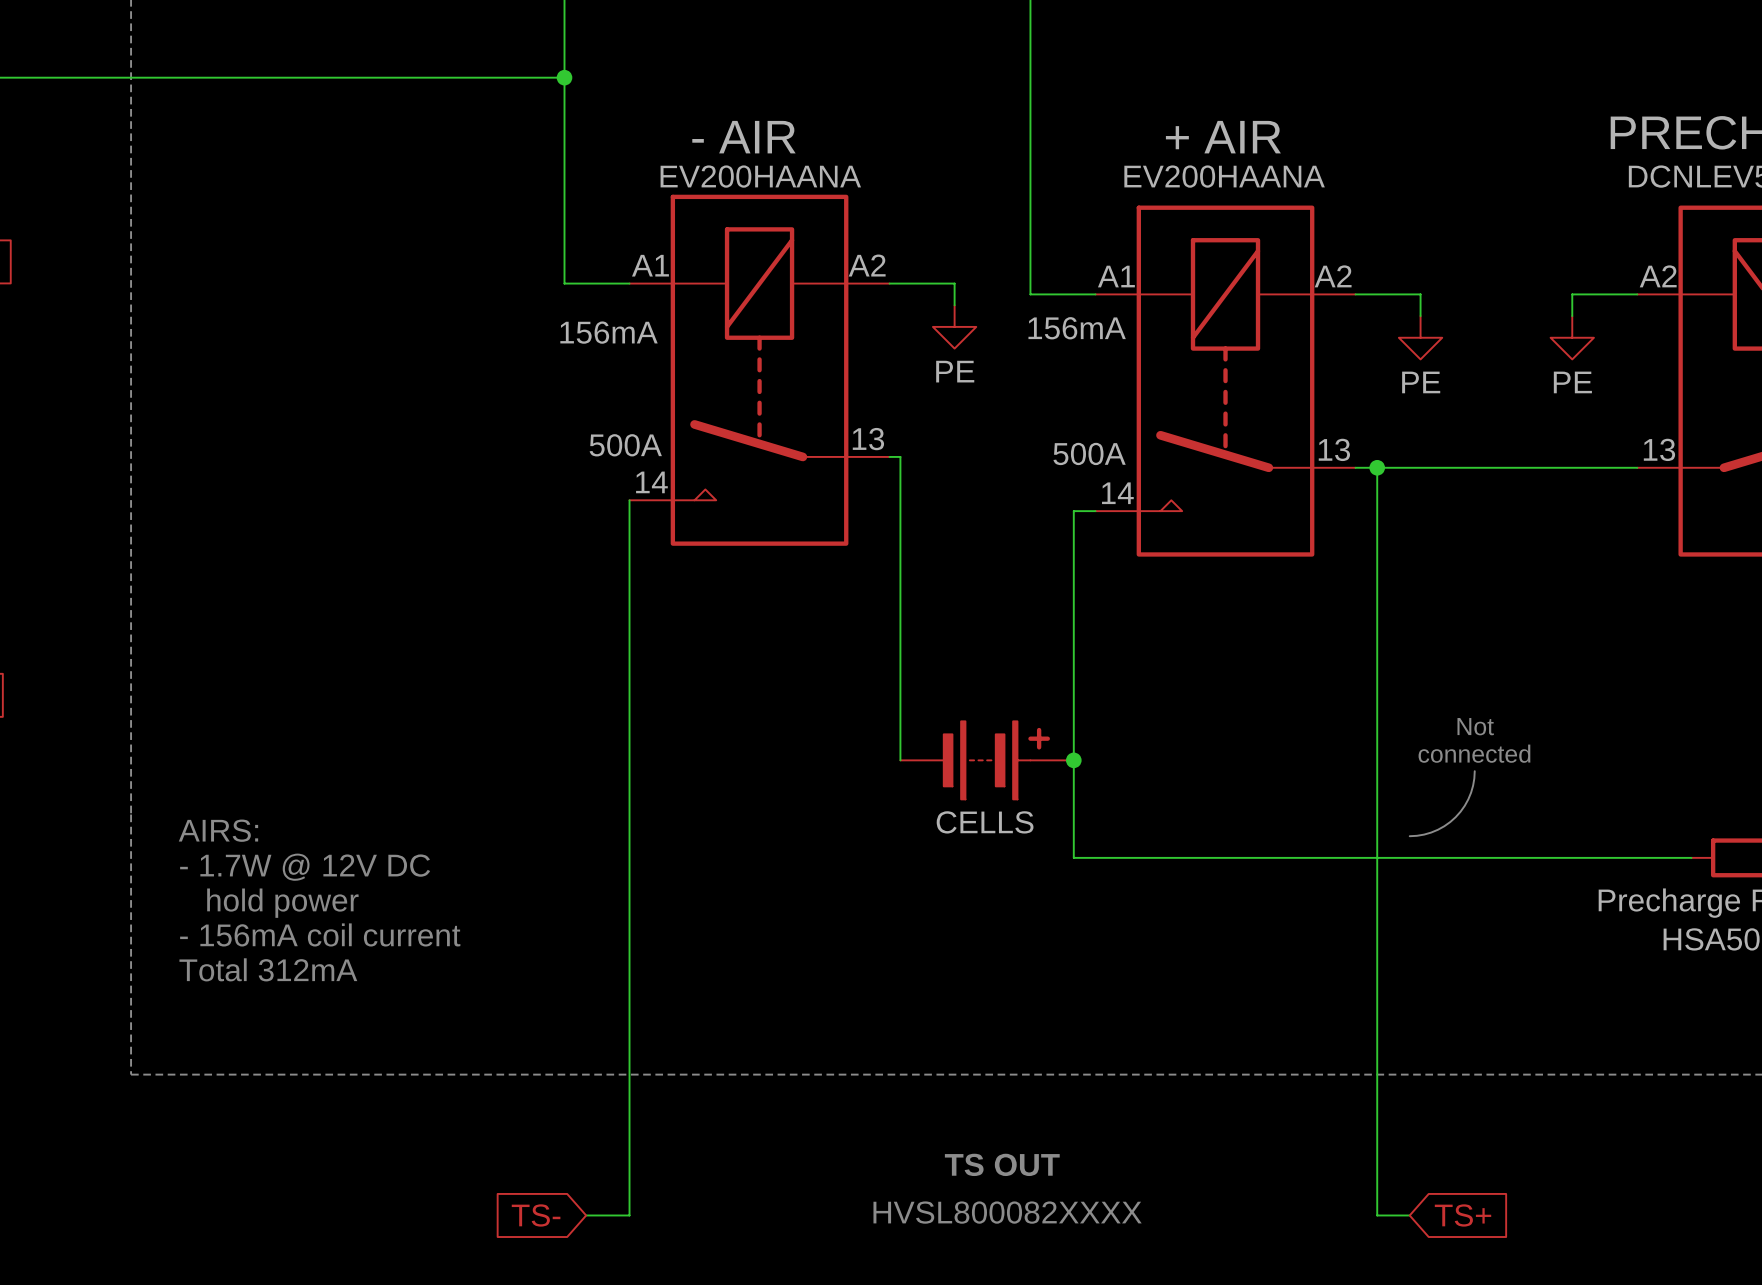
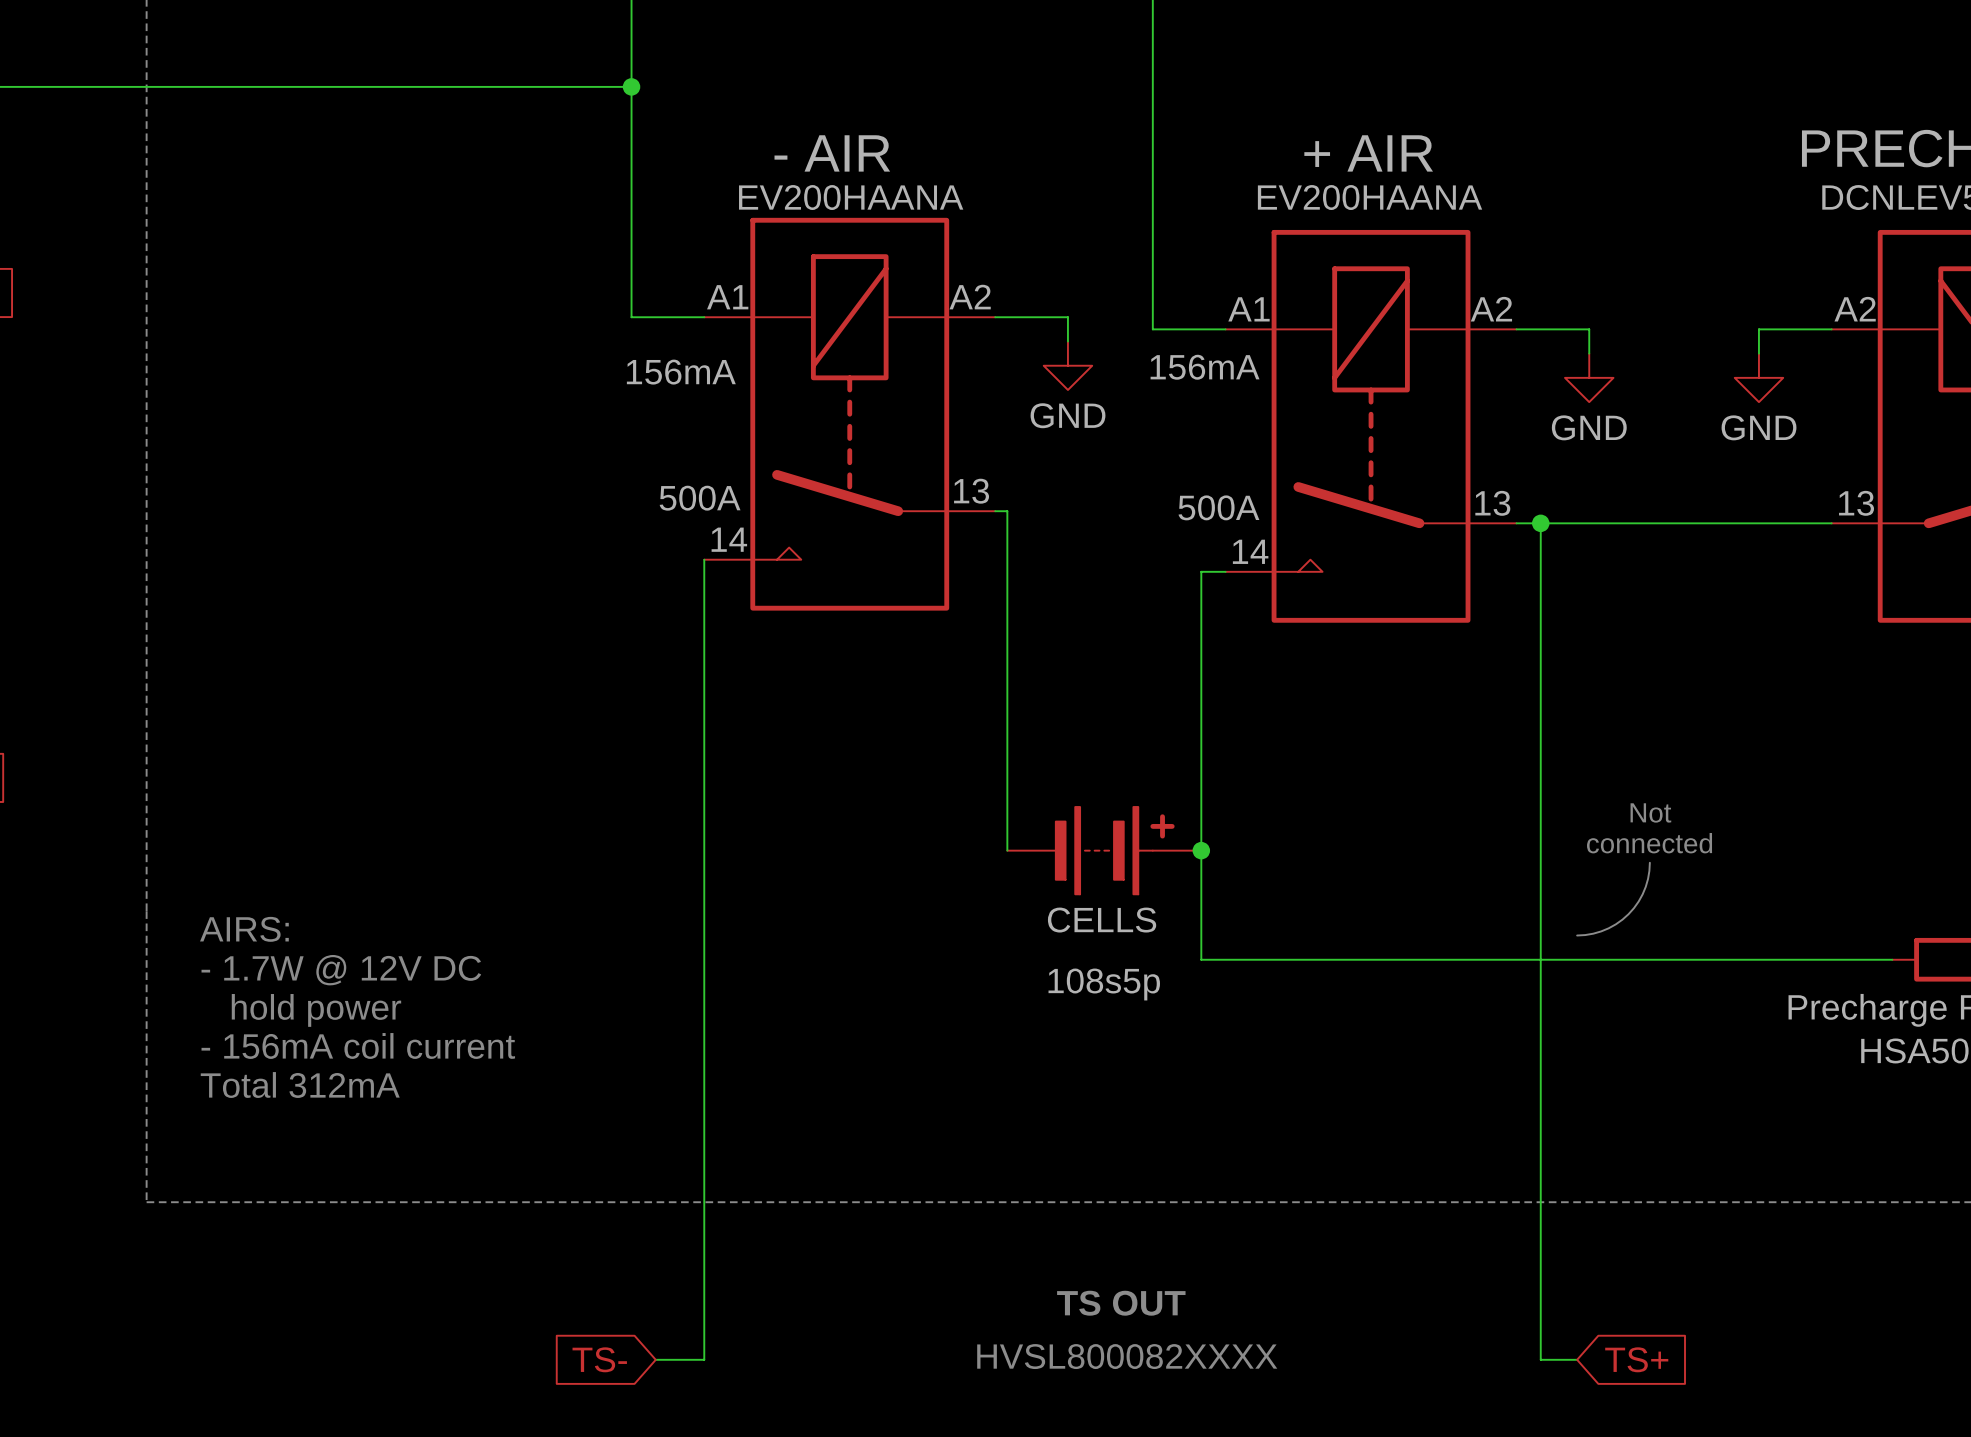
power symbol: PE (954, 326) -> GND (1067, 365)
power symbol: PE (1420, 337) -> GND (1589, 377)
power symbol: PE (1572, 337) -> GND (1758, 377)
part text: none -> 108s5p (1104, 984)

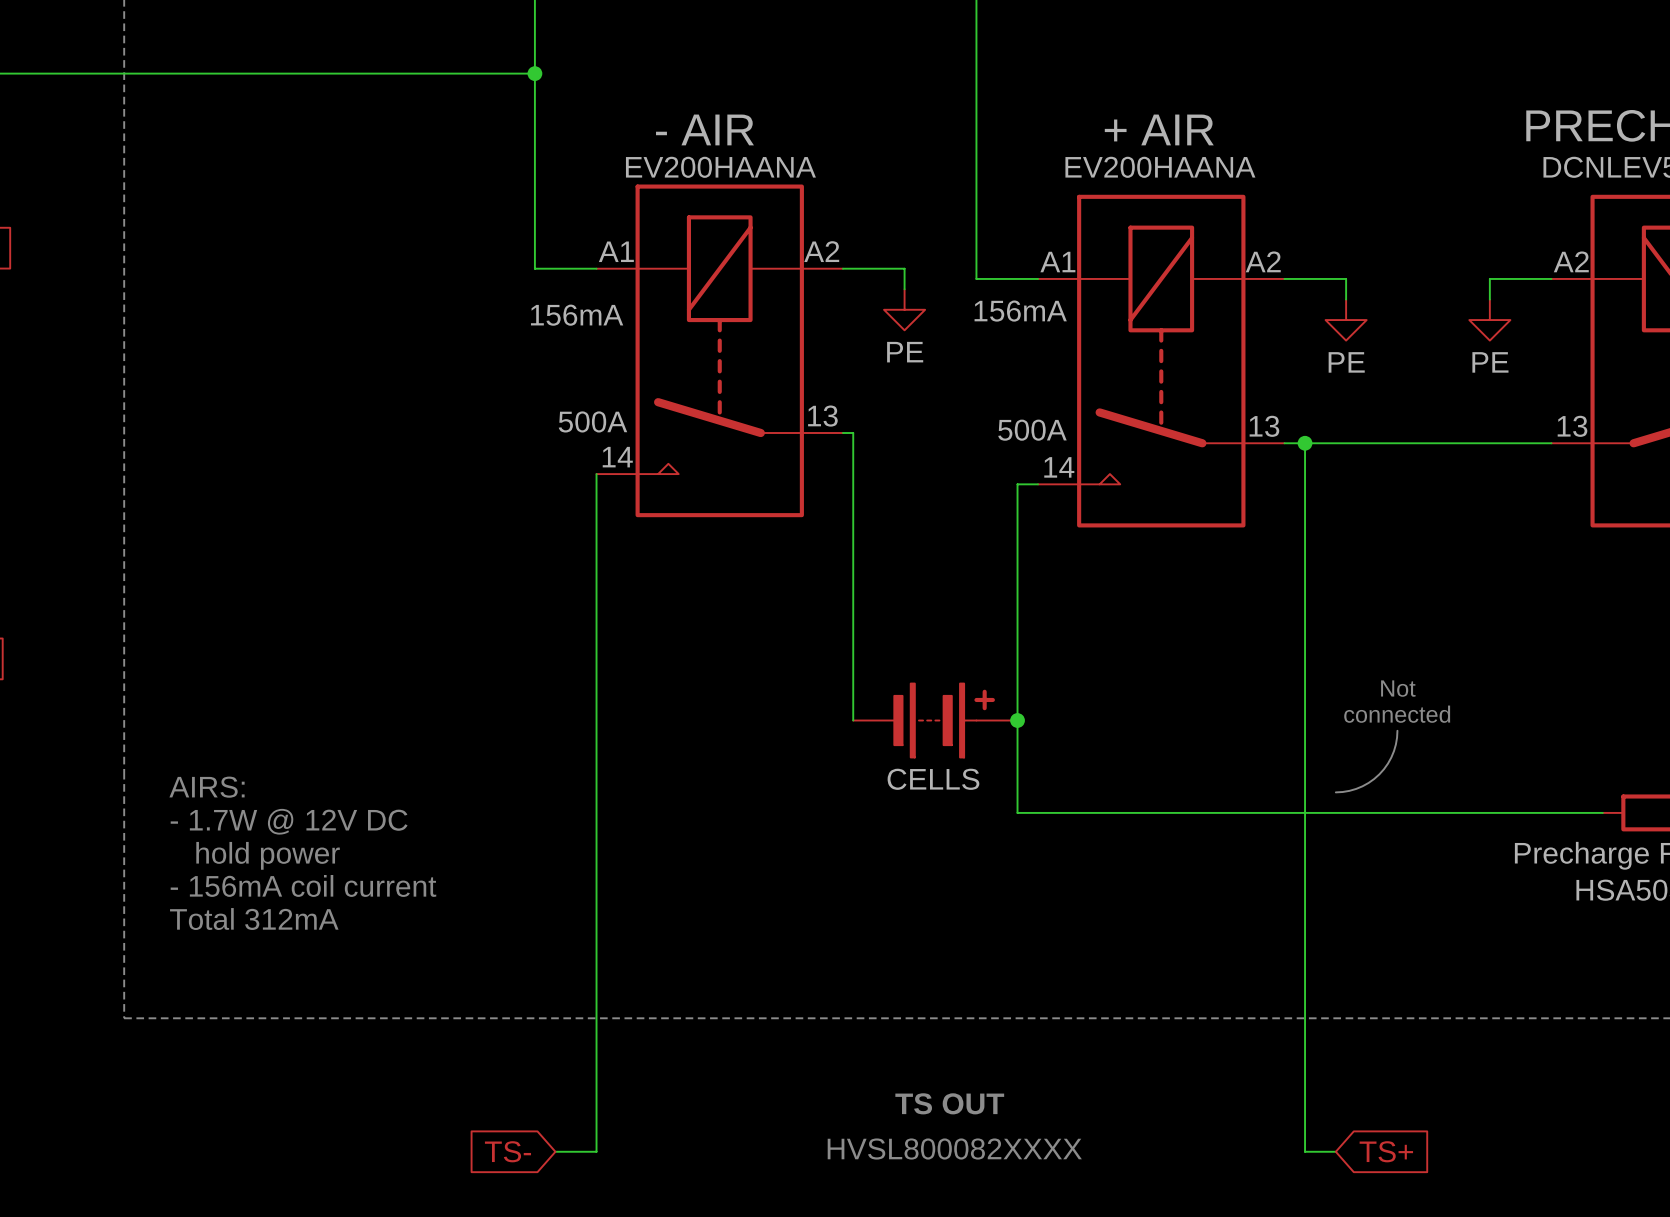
power symbol: GND (1067, 365) -> PE (904, 309)
power symbol: GND (1589, 377) -> PE (1346, 320)
power symbol: GND (1758, 377) -> PE (1489, 320)
part text: 108s5p (1104, 984) -> none

